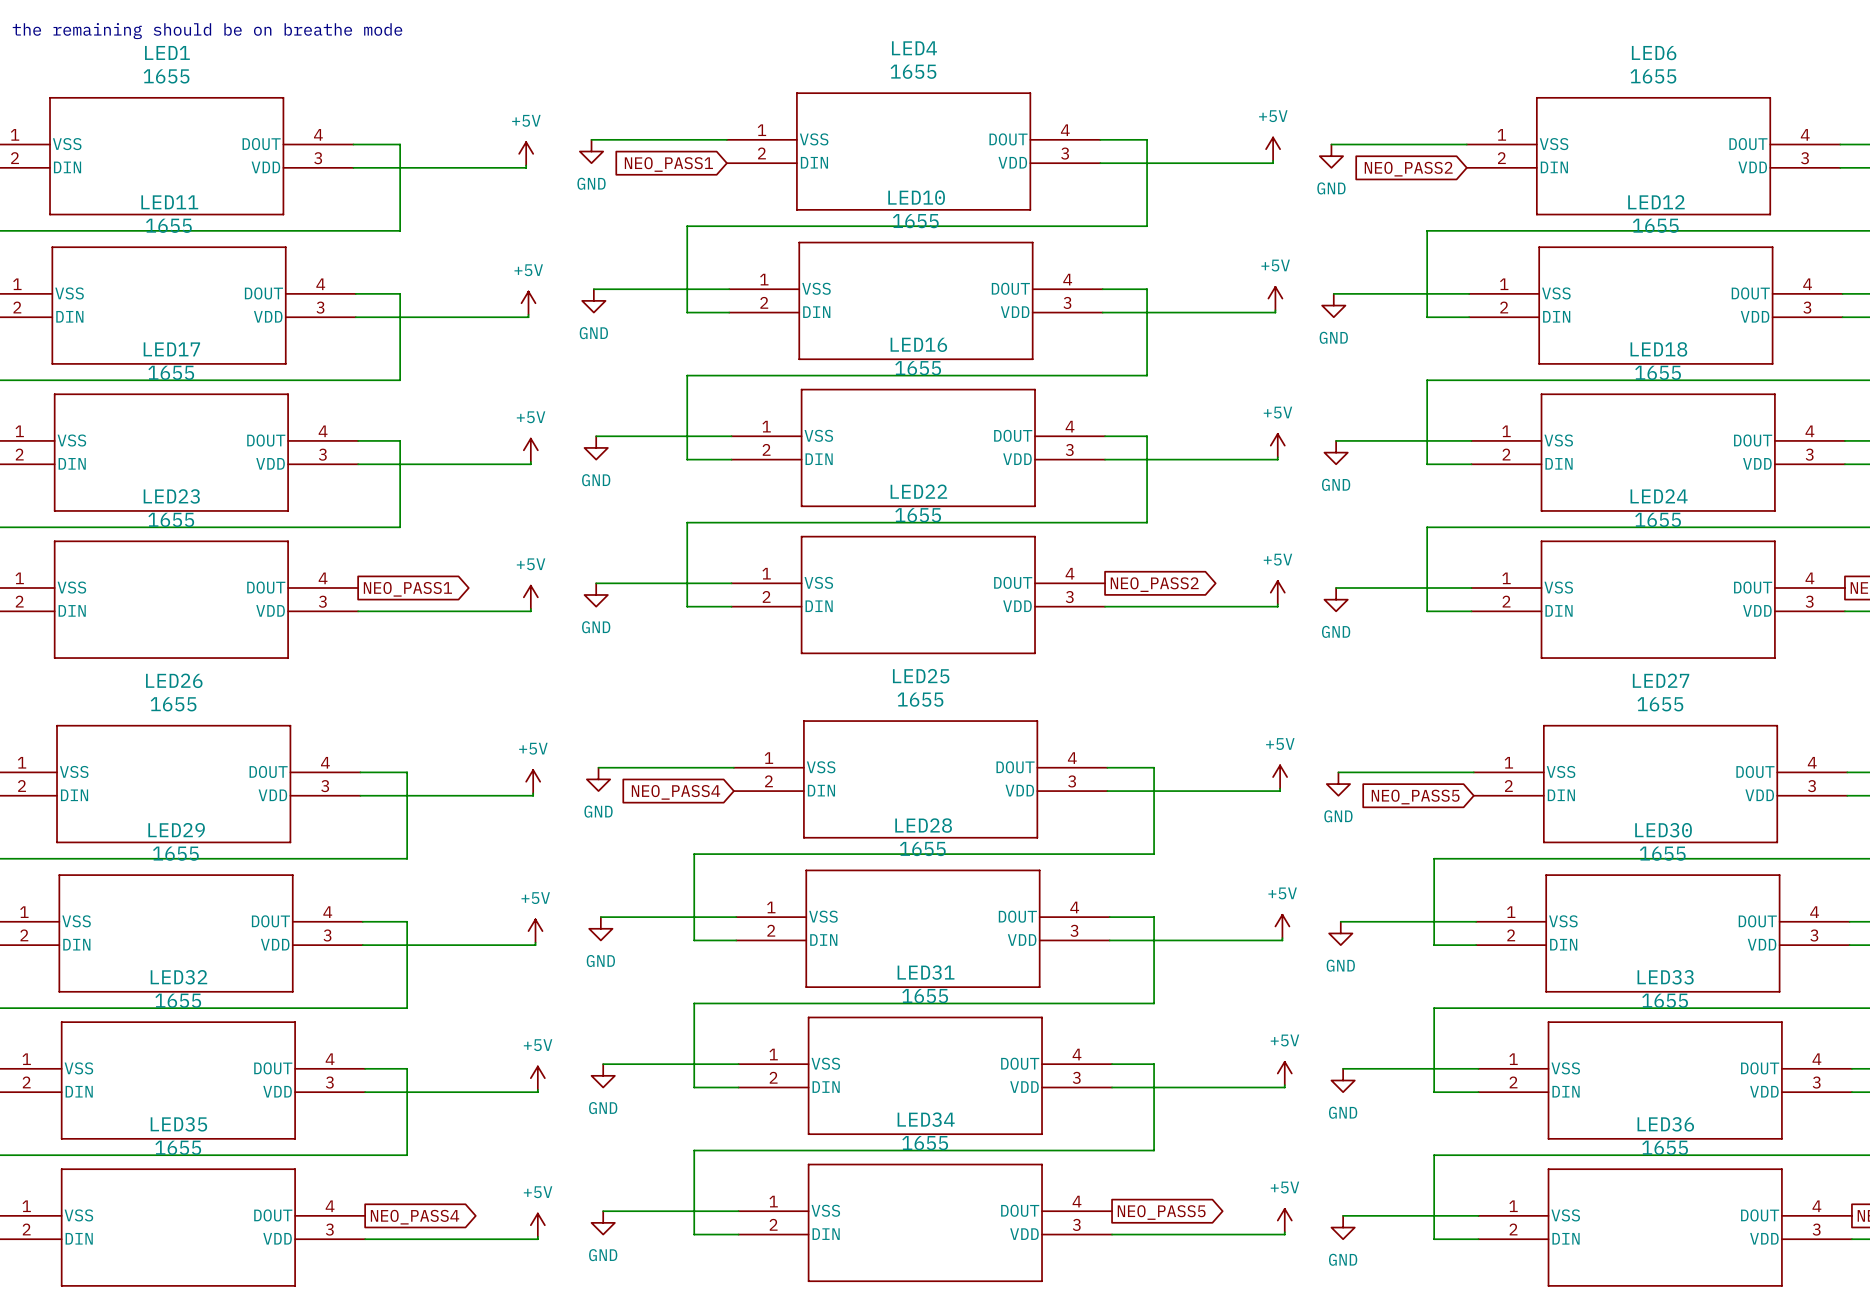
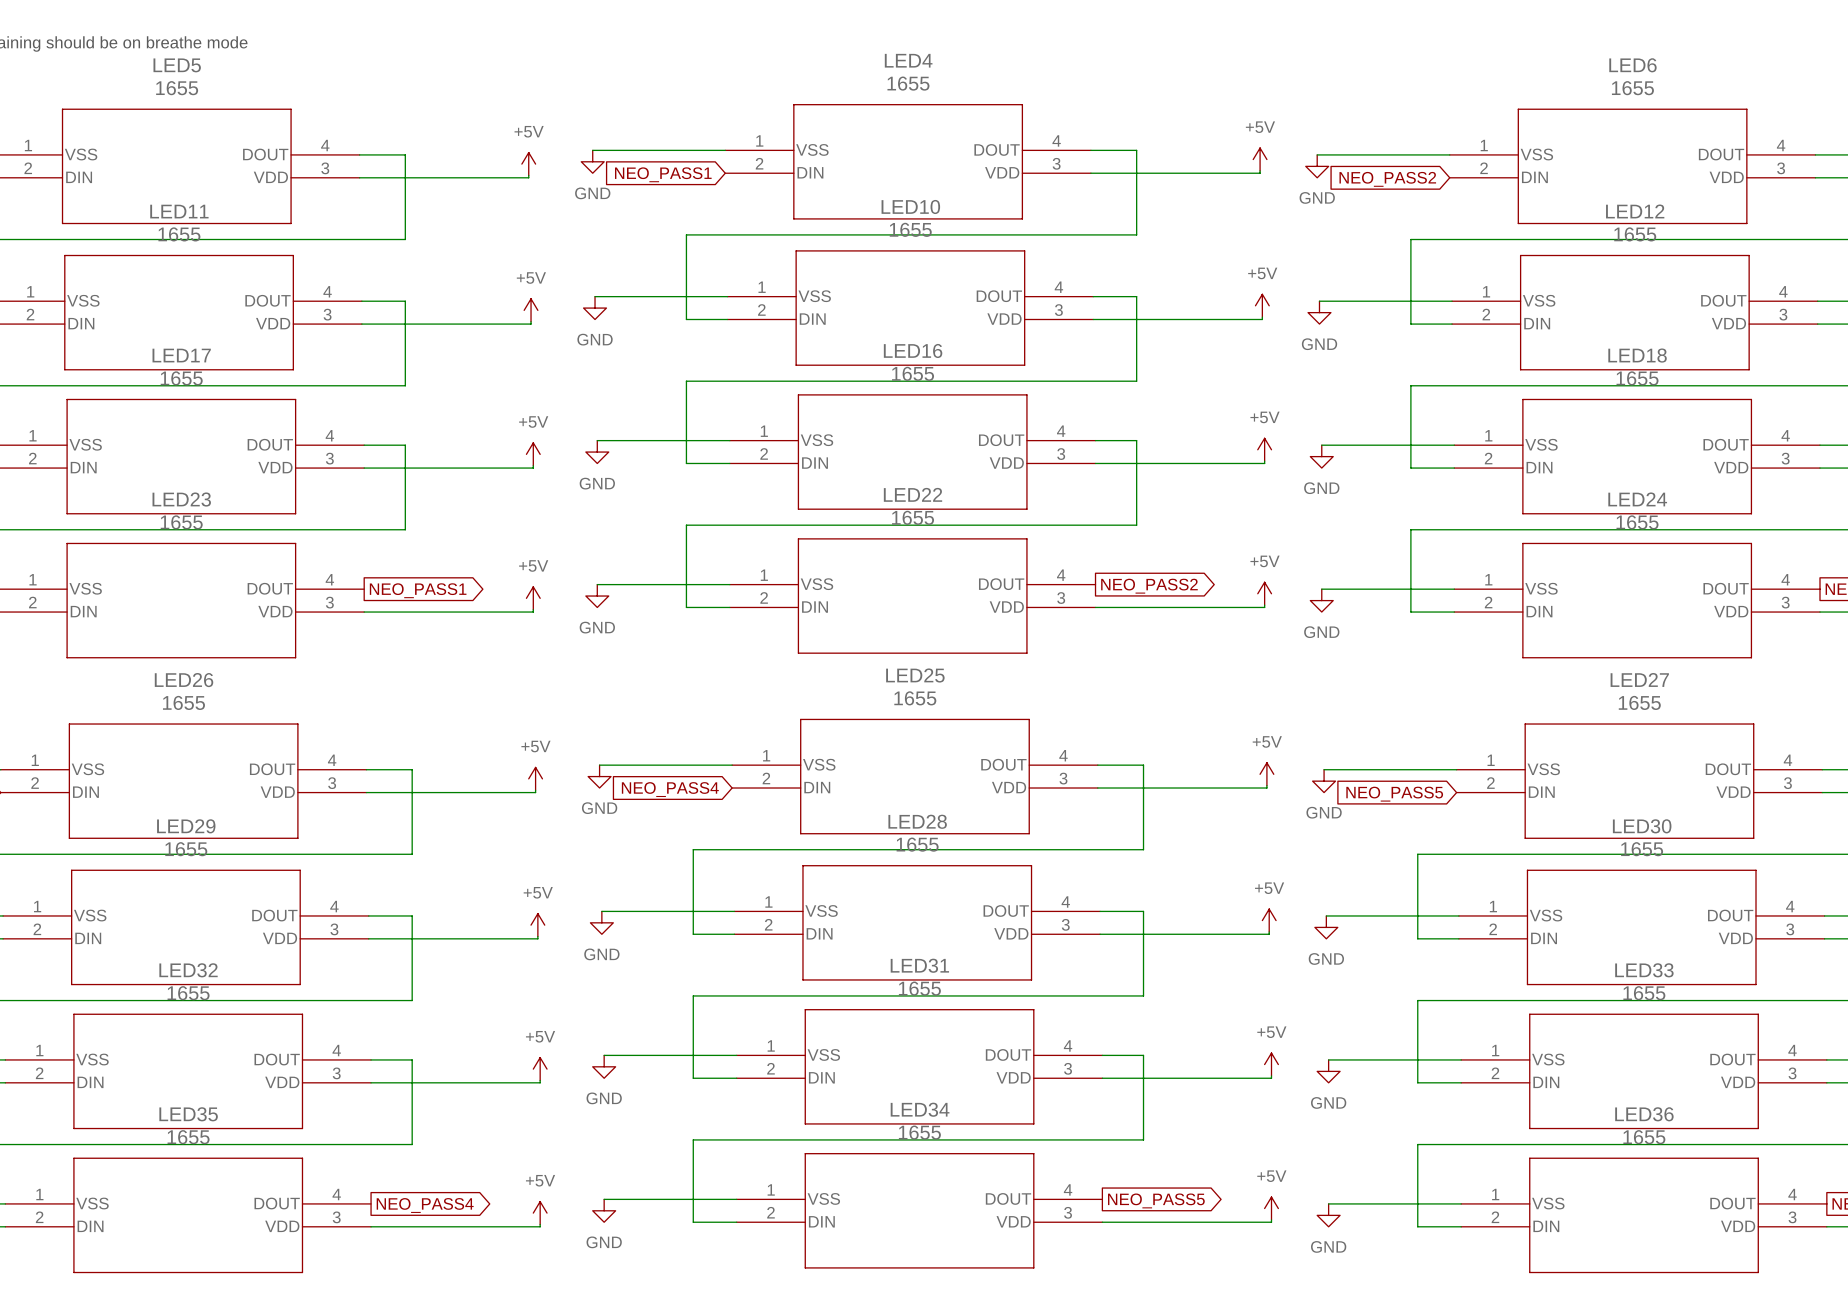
LED1 name: LED1 (167, 52) -> LED5 (177, 65)

